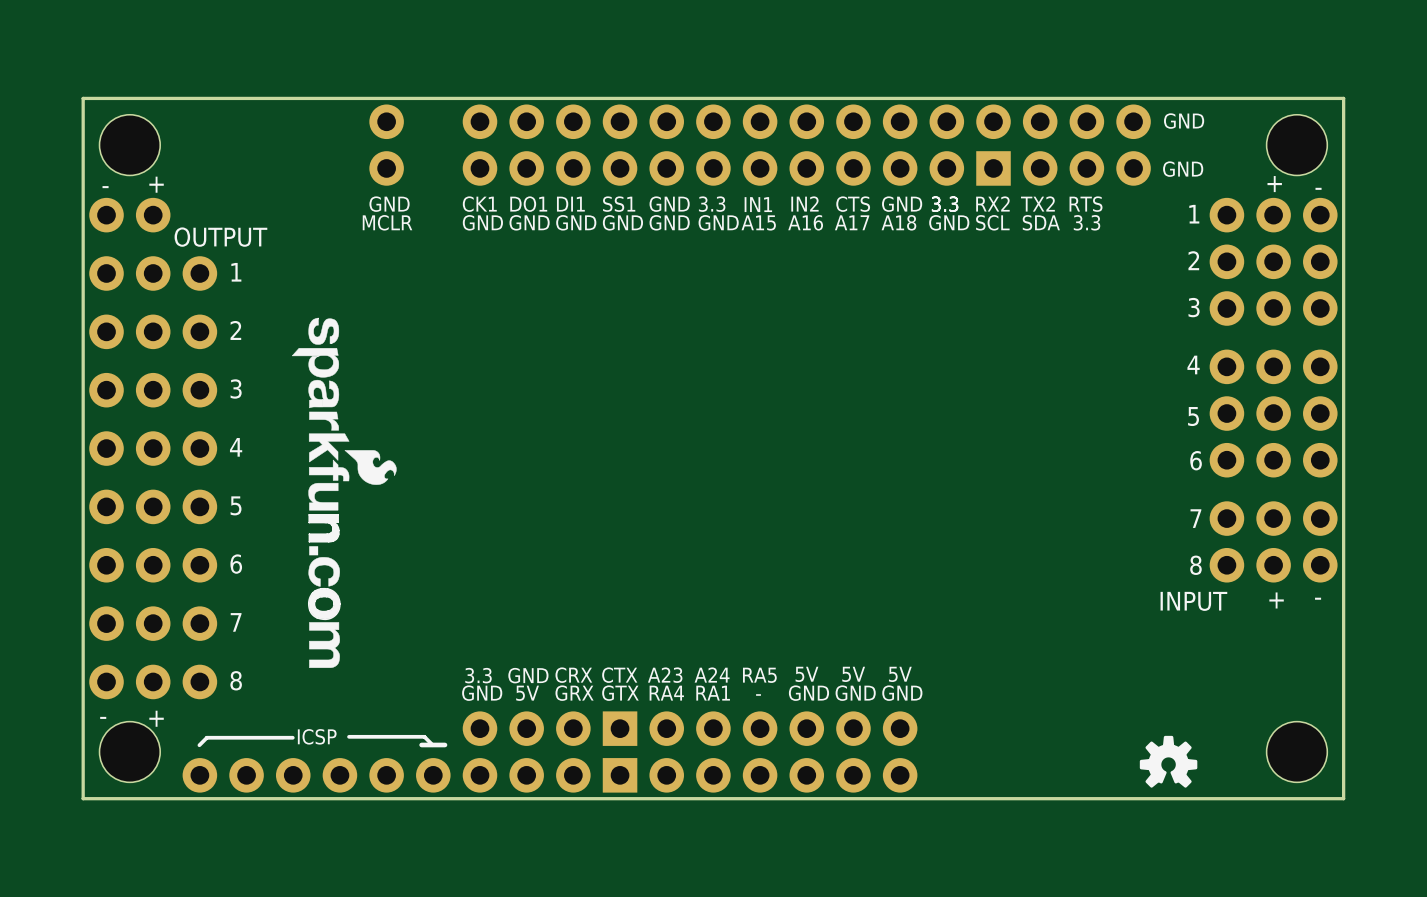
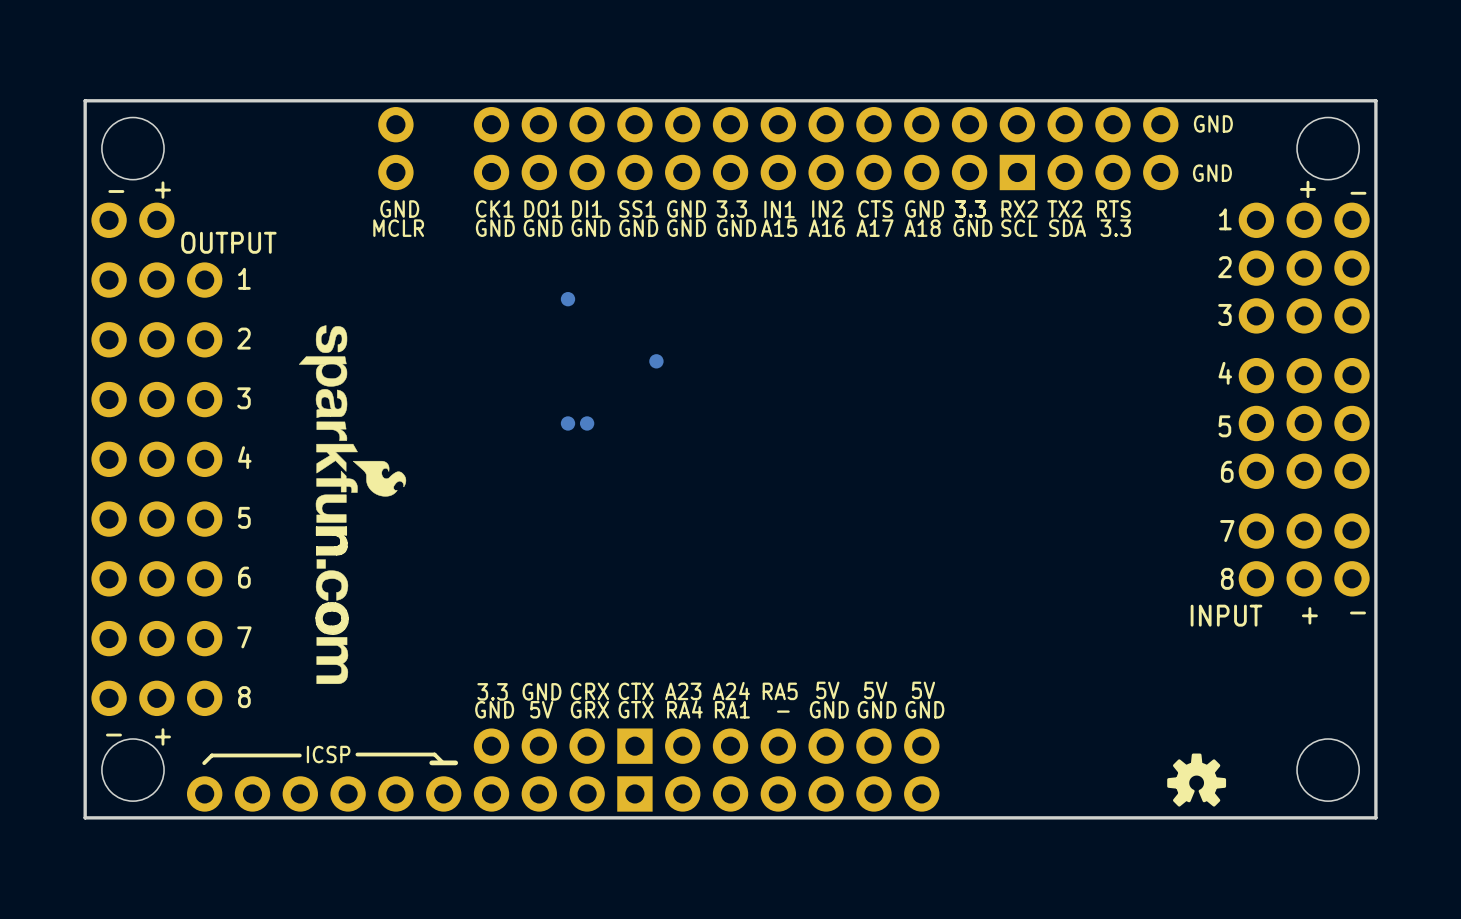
part: none -> (568, 299)
part: none -> (656, 361)
part: none -> (568, 423)
part: none -> (587, 423)

